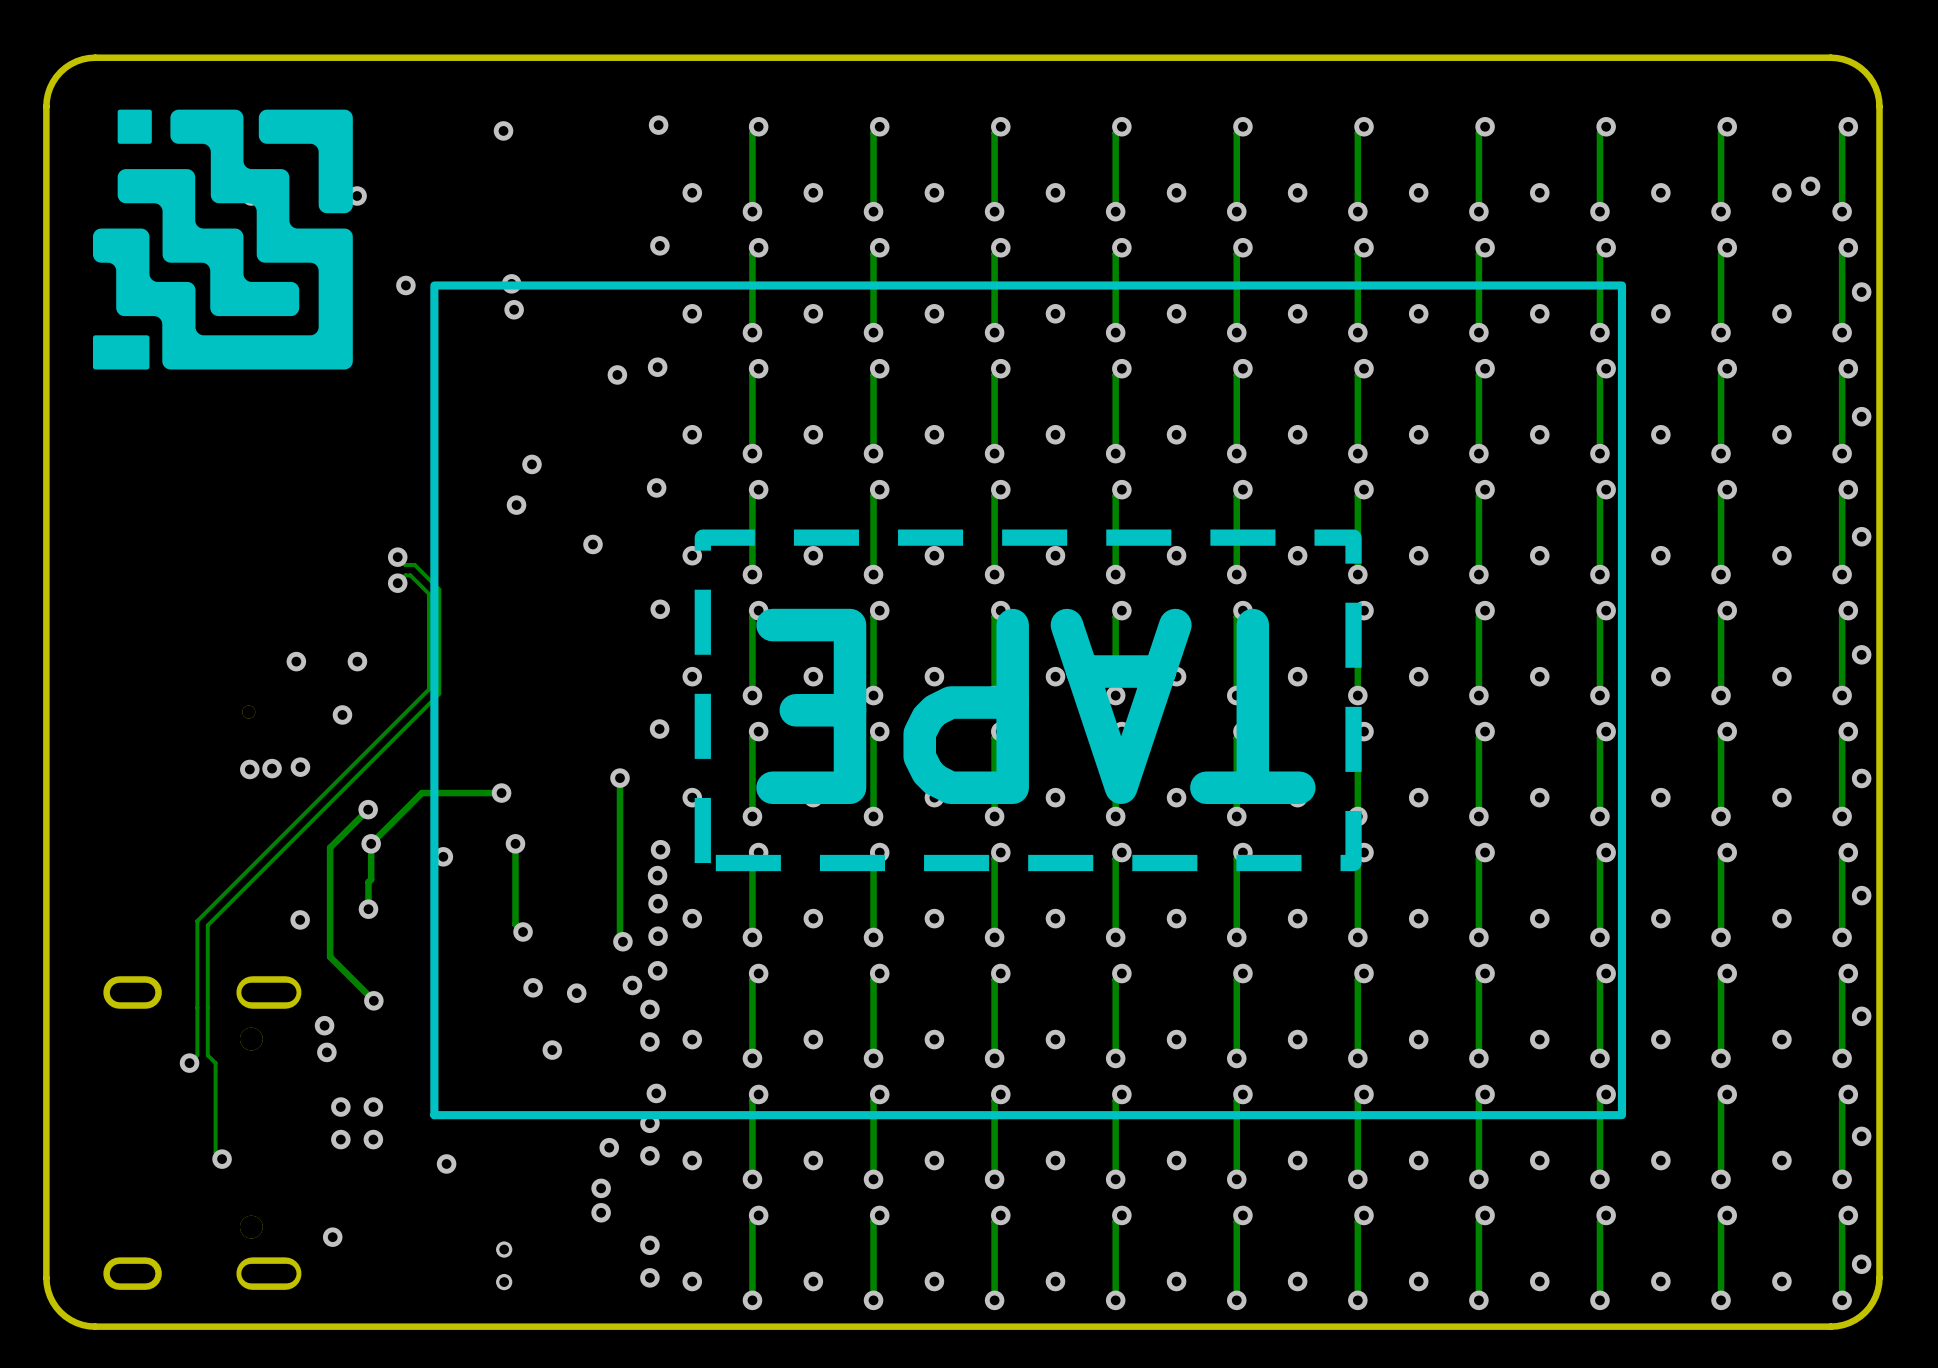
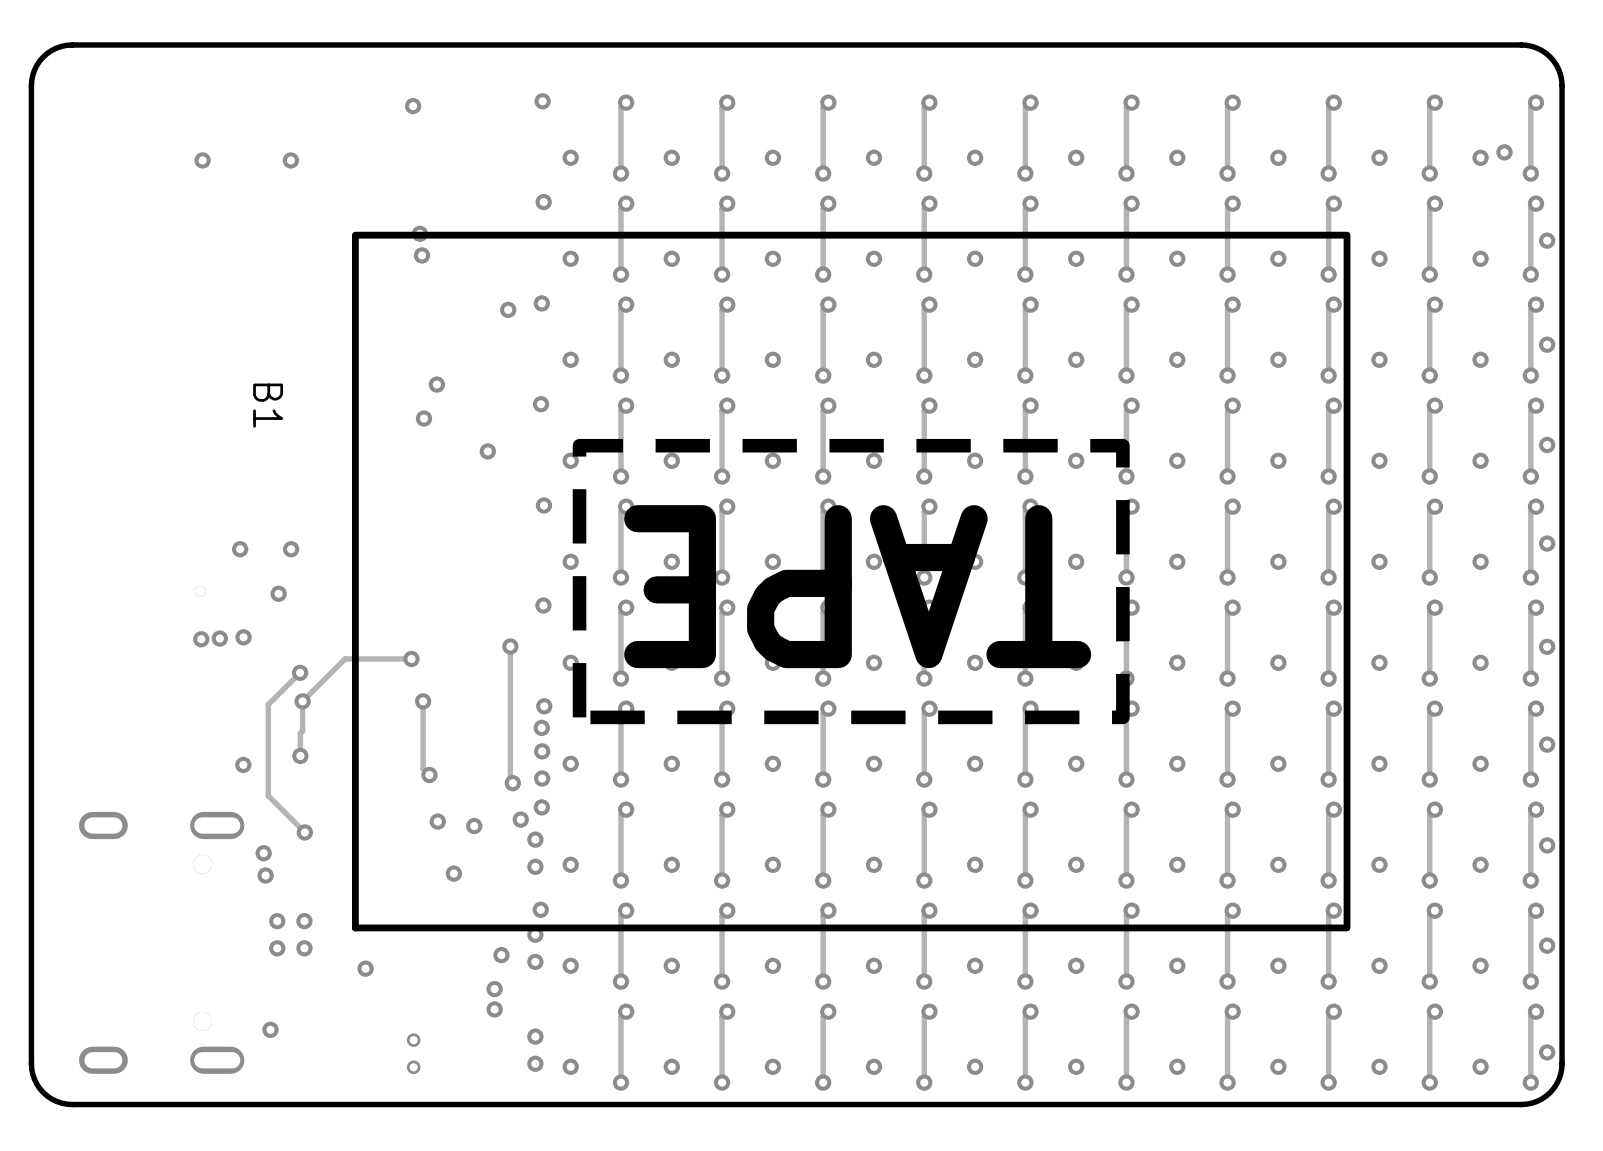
drawing: [92, 109, 353, 370] -> none
drawing: [430, 281, 1627, 1120] -> none
via: (405, 285) -> none
track: (397, 557) (405, 564) (414, 564) (439, 589) (439, 693) (207, 925) (207, 1055) (215, 1063) (215, 1152) (222, 1159) -> none
via: (397, 557) -> none
track: (397, 583) (405, 575) (410, 575) (428, 593) (428, 689) (197, 921) (197, 1055) (189, 1063) -> none
via: (397, 583) -> none
B1: none -> (851, 581)
via: (443, 856) -> none
via: (189, 1063) -> none
via: (222, 1159) -> none

